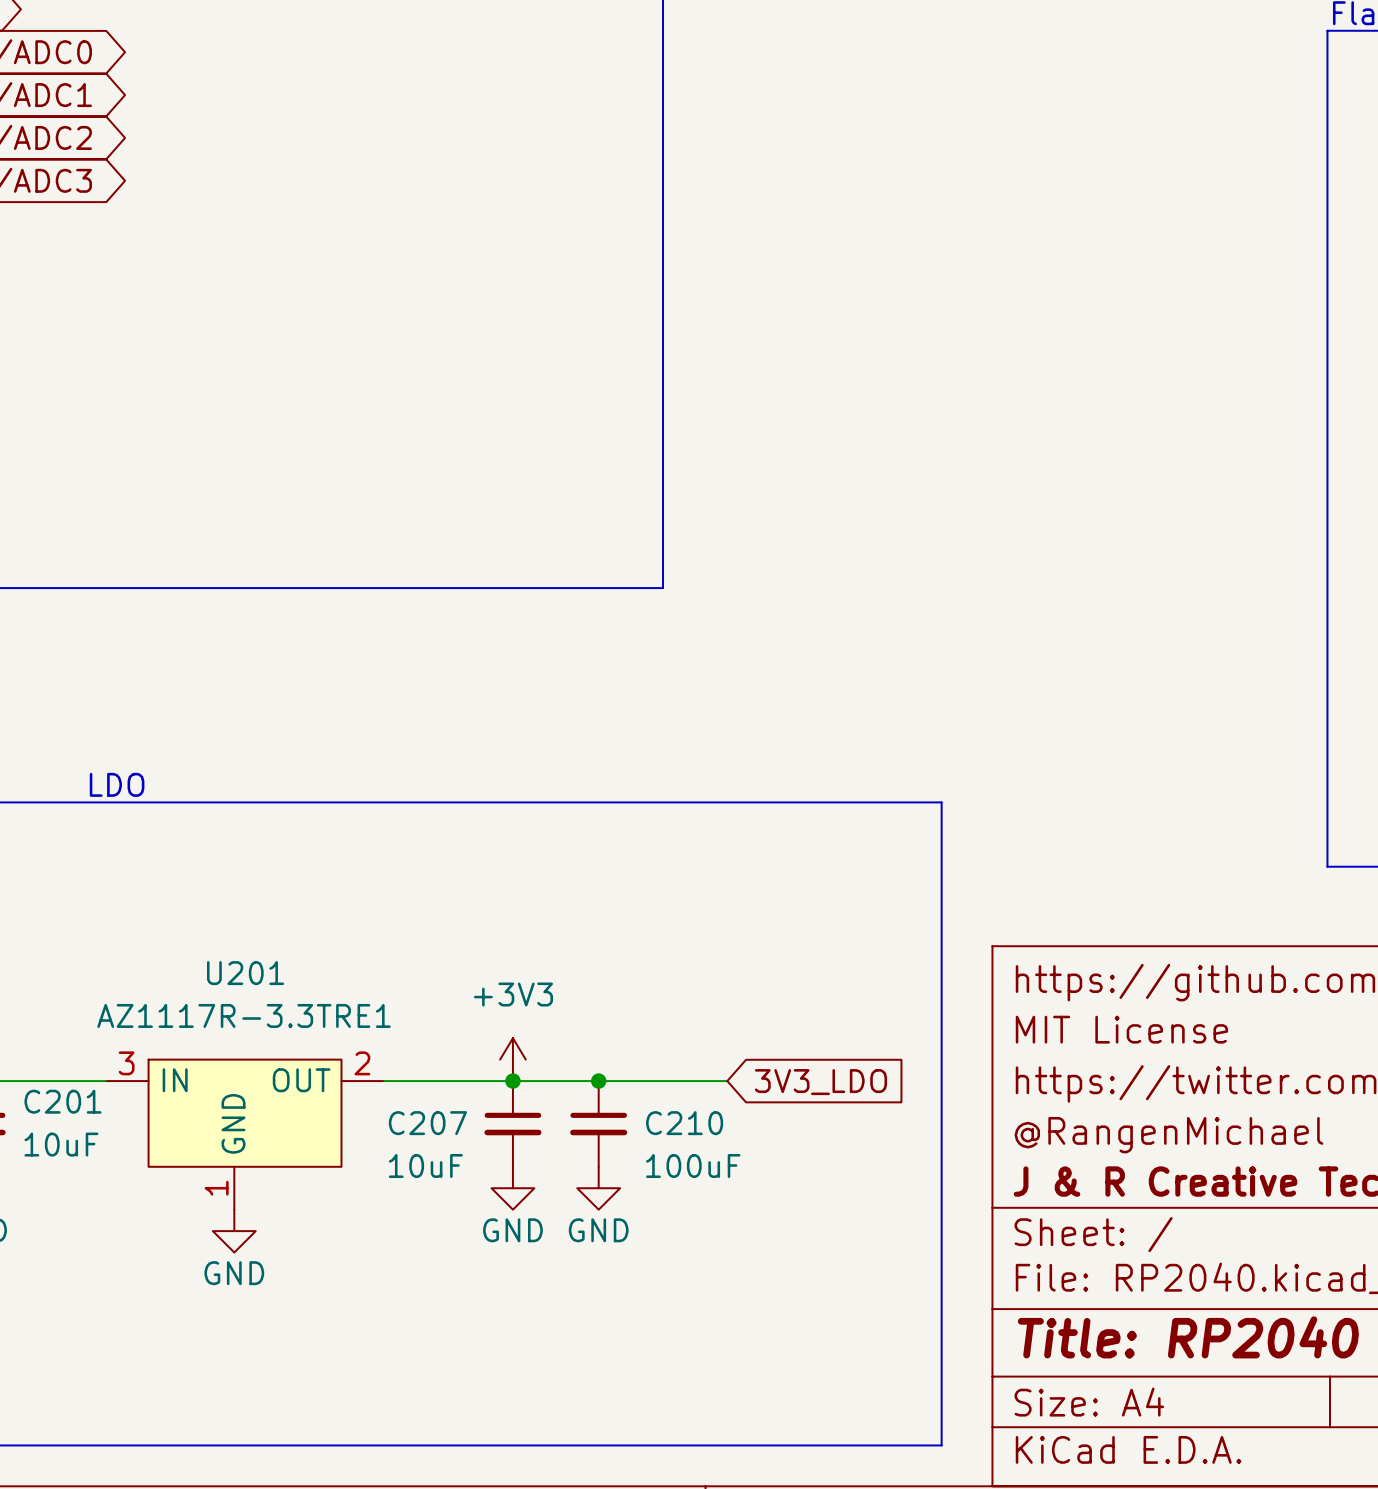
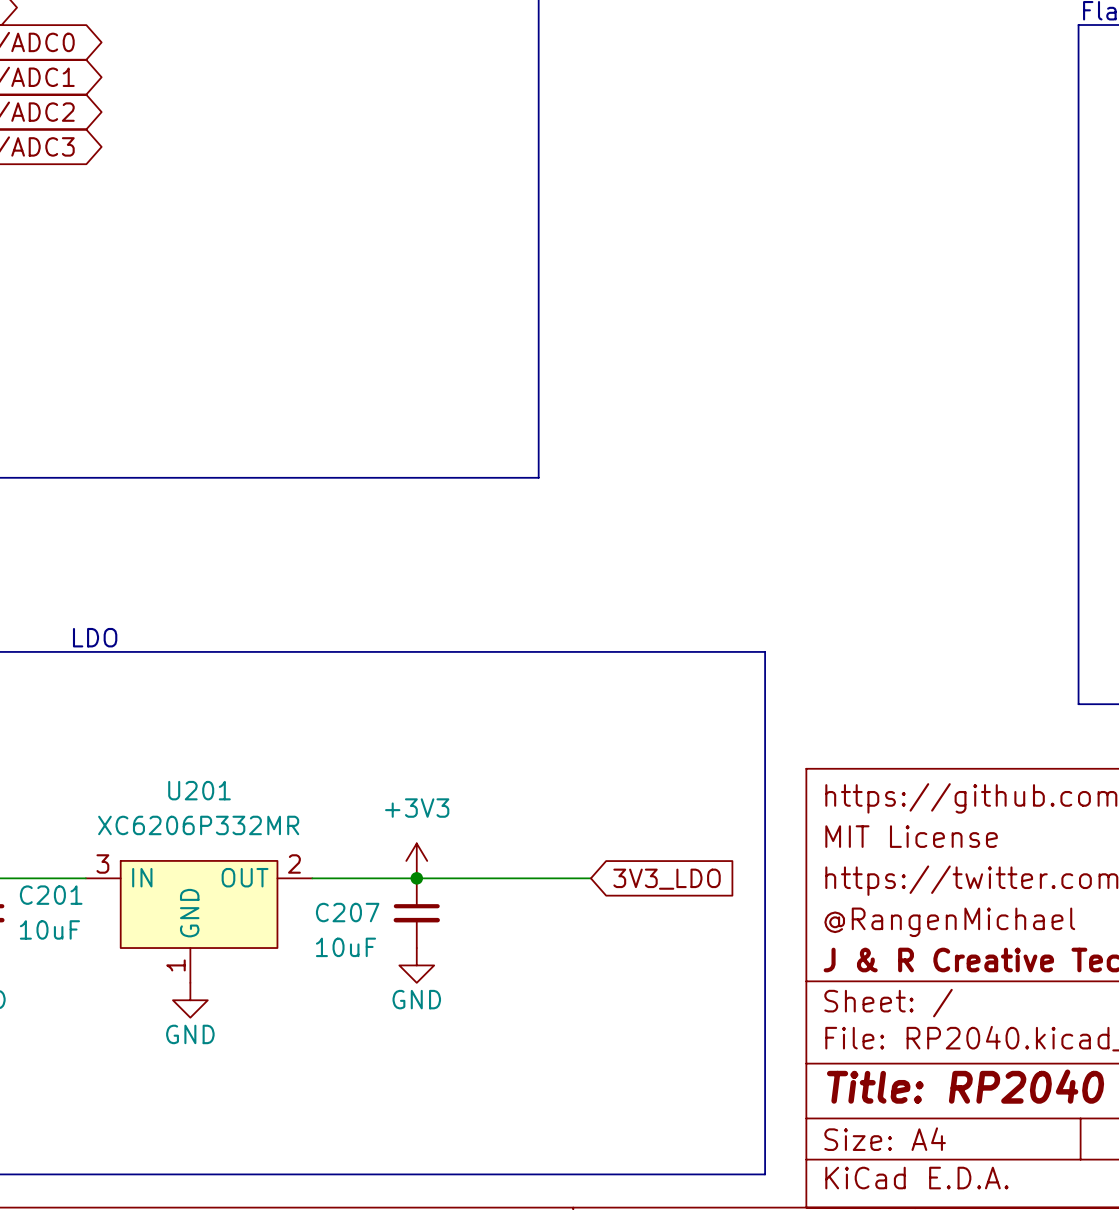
U201 value: AZ1117R-3.3TRE1 (244, 1015) -> XC6206P332MR (198, 825)
junction: (598, 1081) -> none
C210: 100uF (598, 1123) -> none
power symbol: GND (598, 1188) -> none

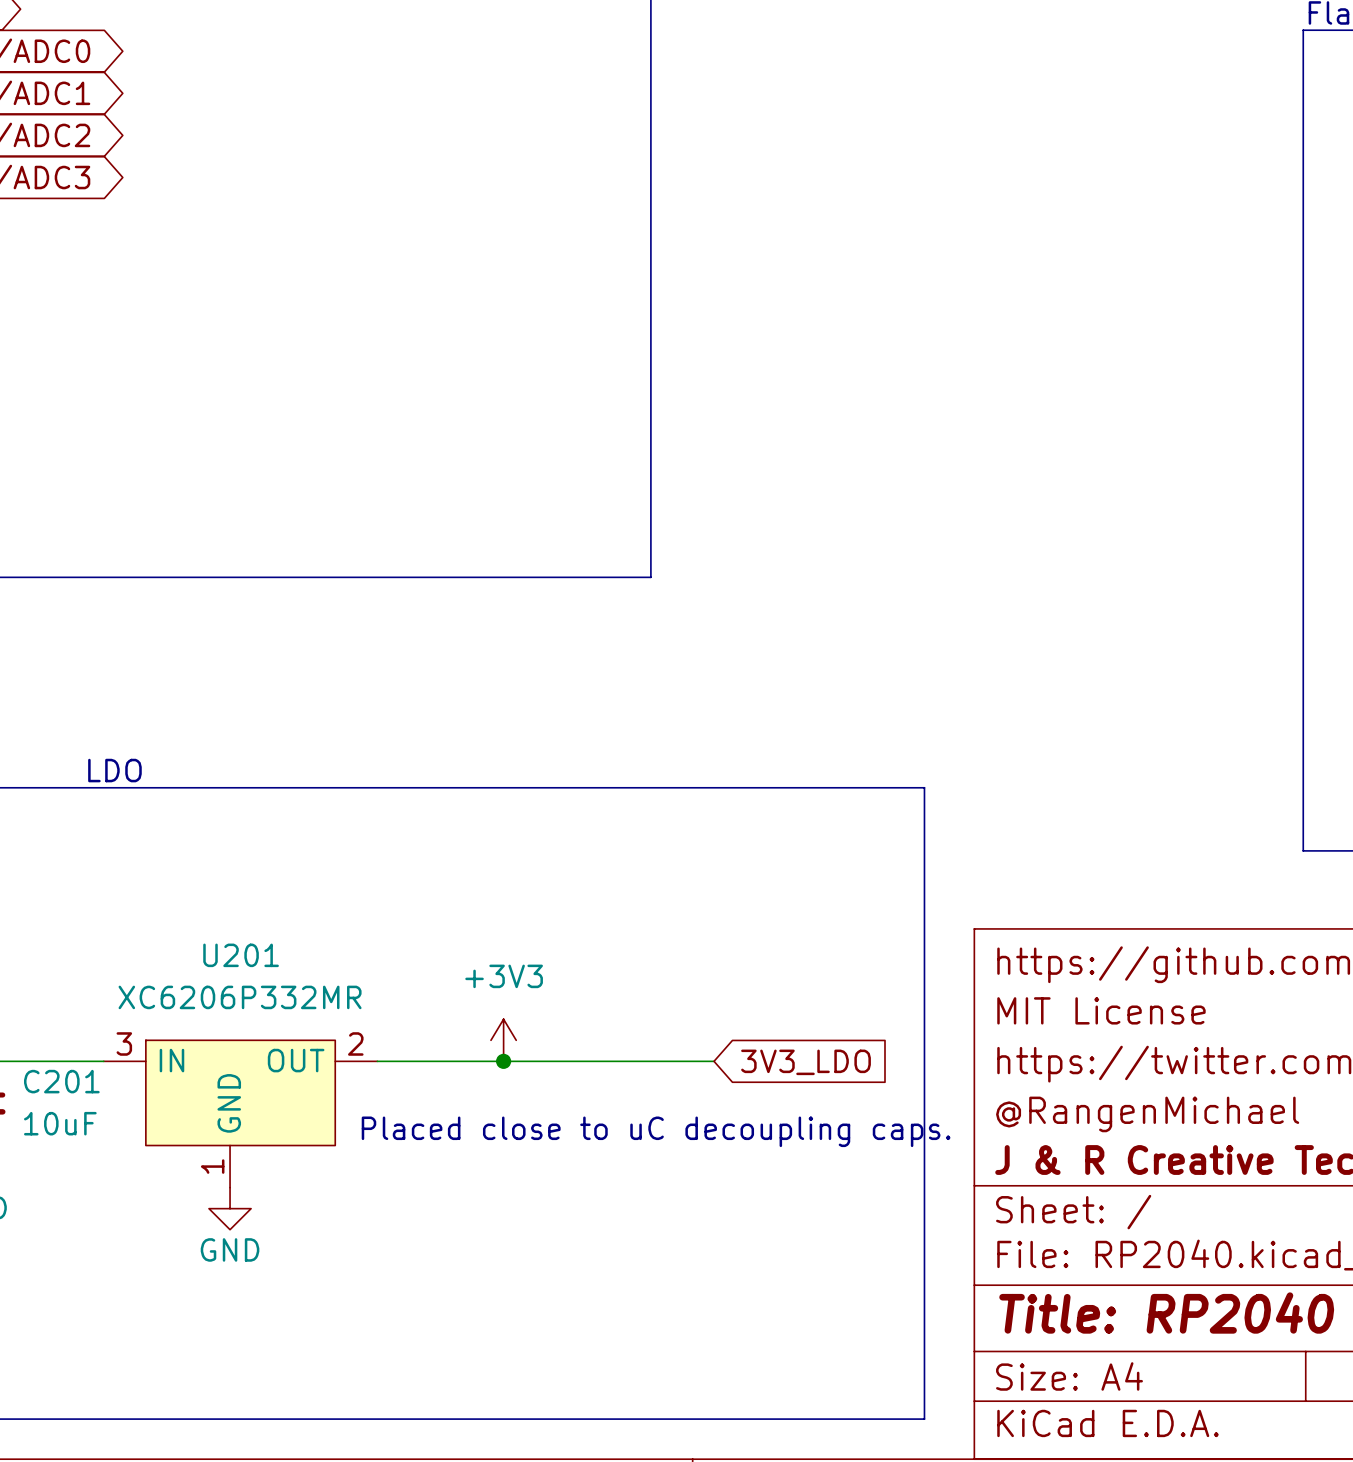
C207: 10uF (416, 913) -> none
text: none -> Placed close to uC decoupling caps. (656, 1131)
power symbol: GND (416, 965) -> none

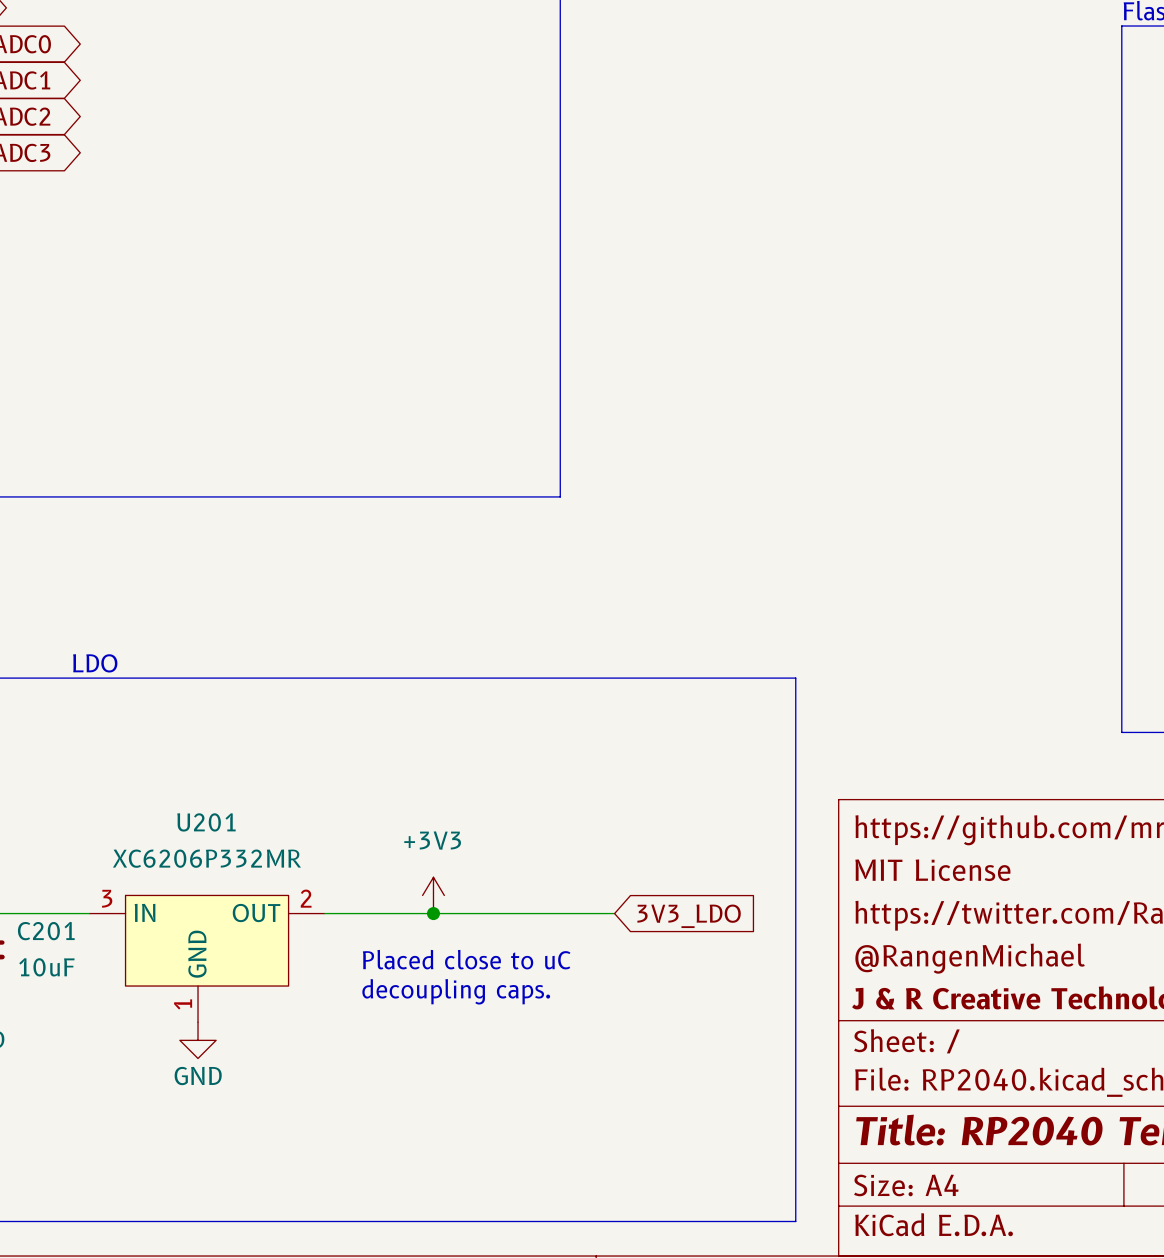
text: none -> Placed close to uC (466, 959)
text: Placed close to uC decoupling caps. (656, 1131) -> none
text: none -> decoupling caps. (456, 991)

